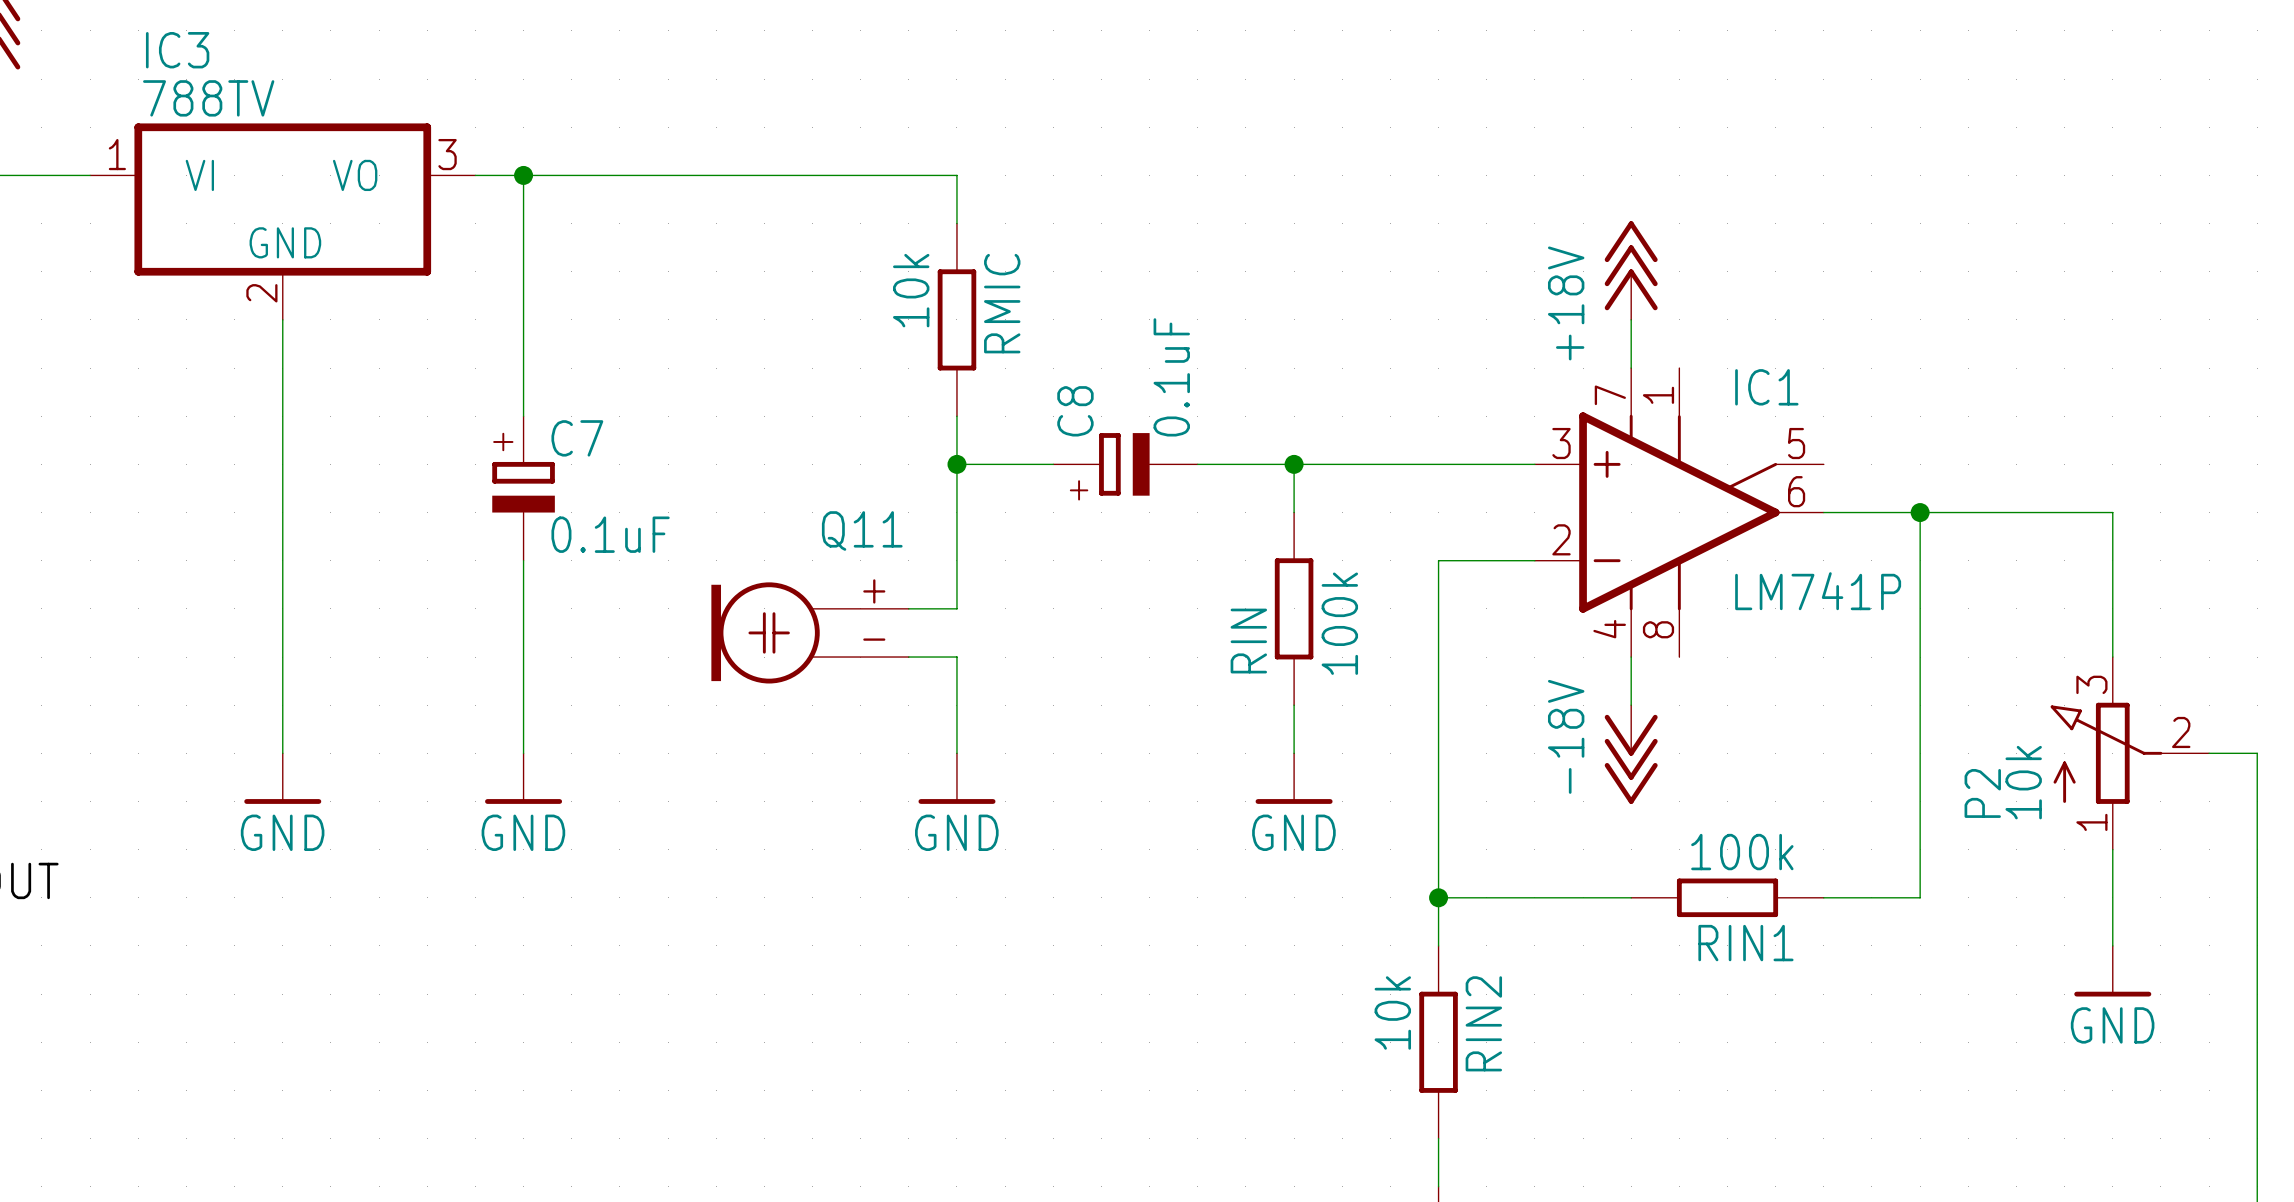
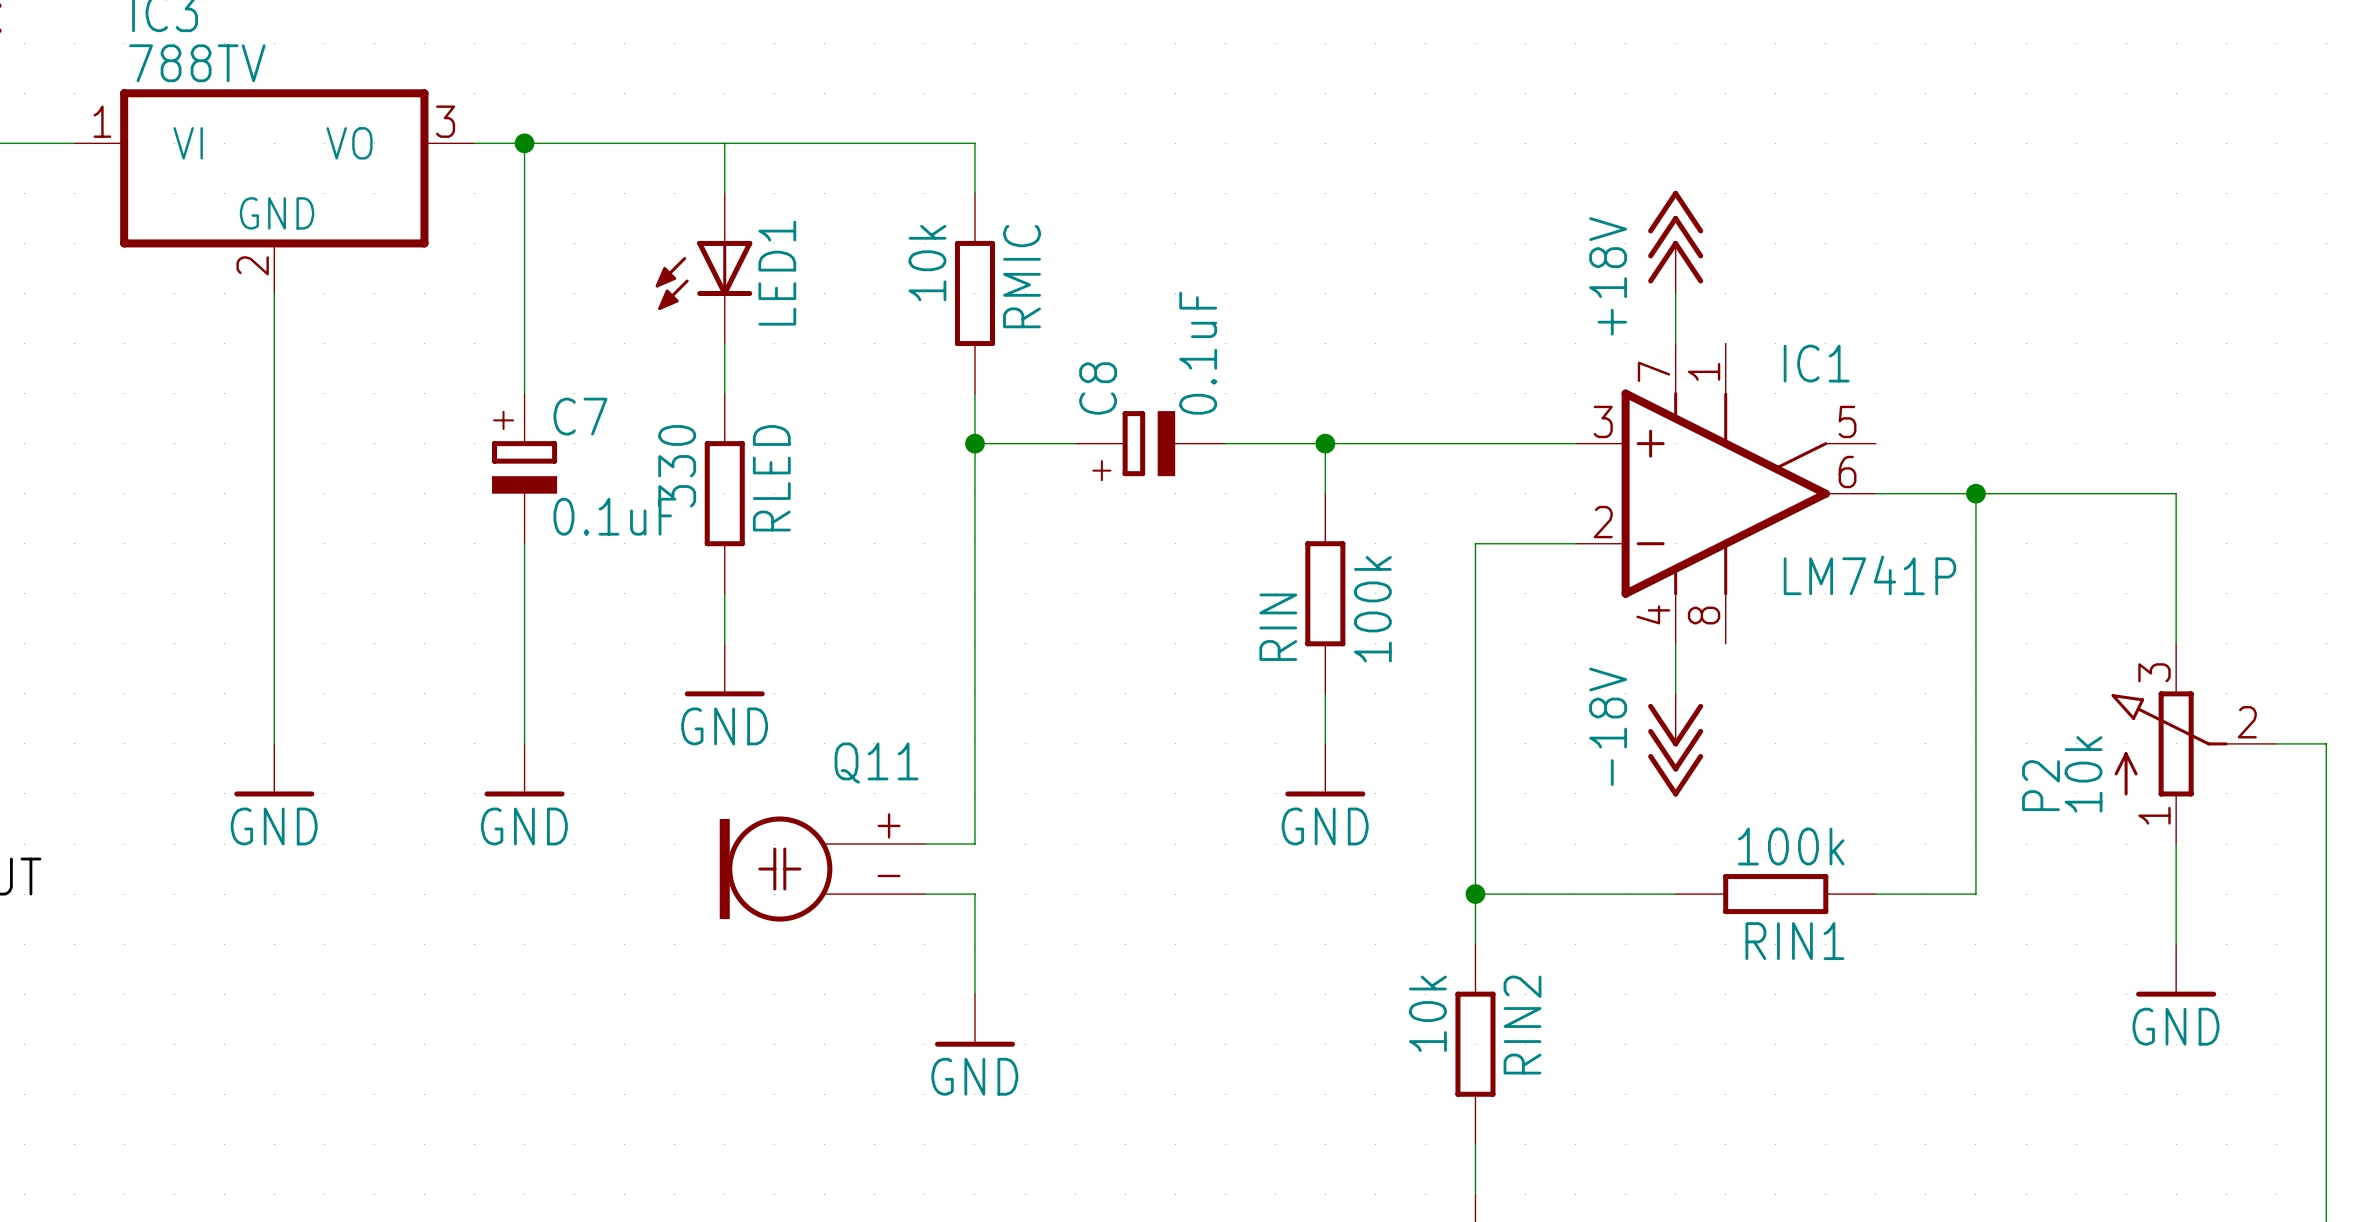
wire: none -> (724, 143) (724, 193)
LED1: none -> (703, 268)
wire: none -> (724, 343) (724, 393)
RLED: none -> 330 (724, 493)
wire: (908, 608) (956, 608) -> (974, 643) (974, 593)
Q11 position: (810, 632) -> (822, 869)
wire: (908, 657) (956, 657) -> none
power symbol: none -> GND (724, 670)
wire: none -> (974, 743) (974, 844) (924, 844)
power symbol: GND (956, 778) -> none
wire: none -> (924, 894) (974, 894) (974, 994)
power symbol: none -> GND (974, 1020)

